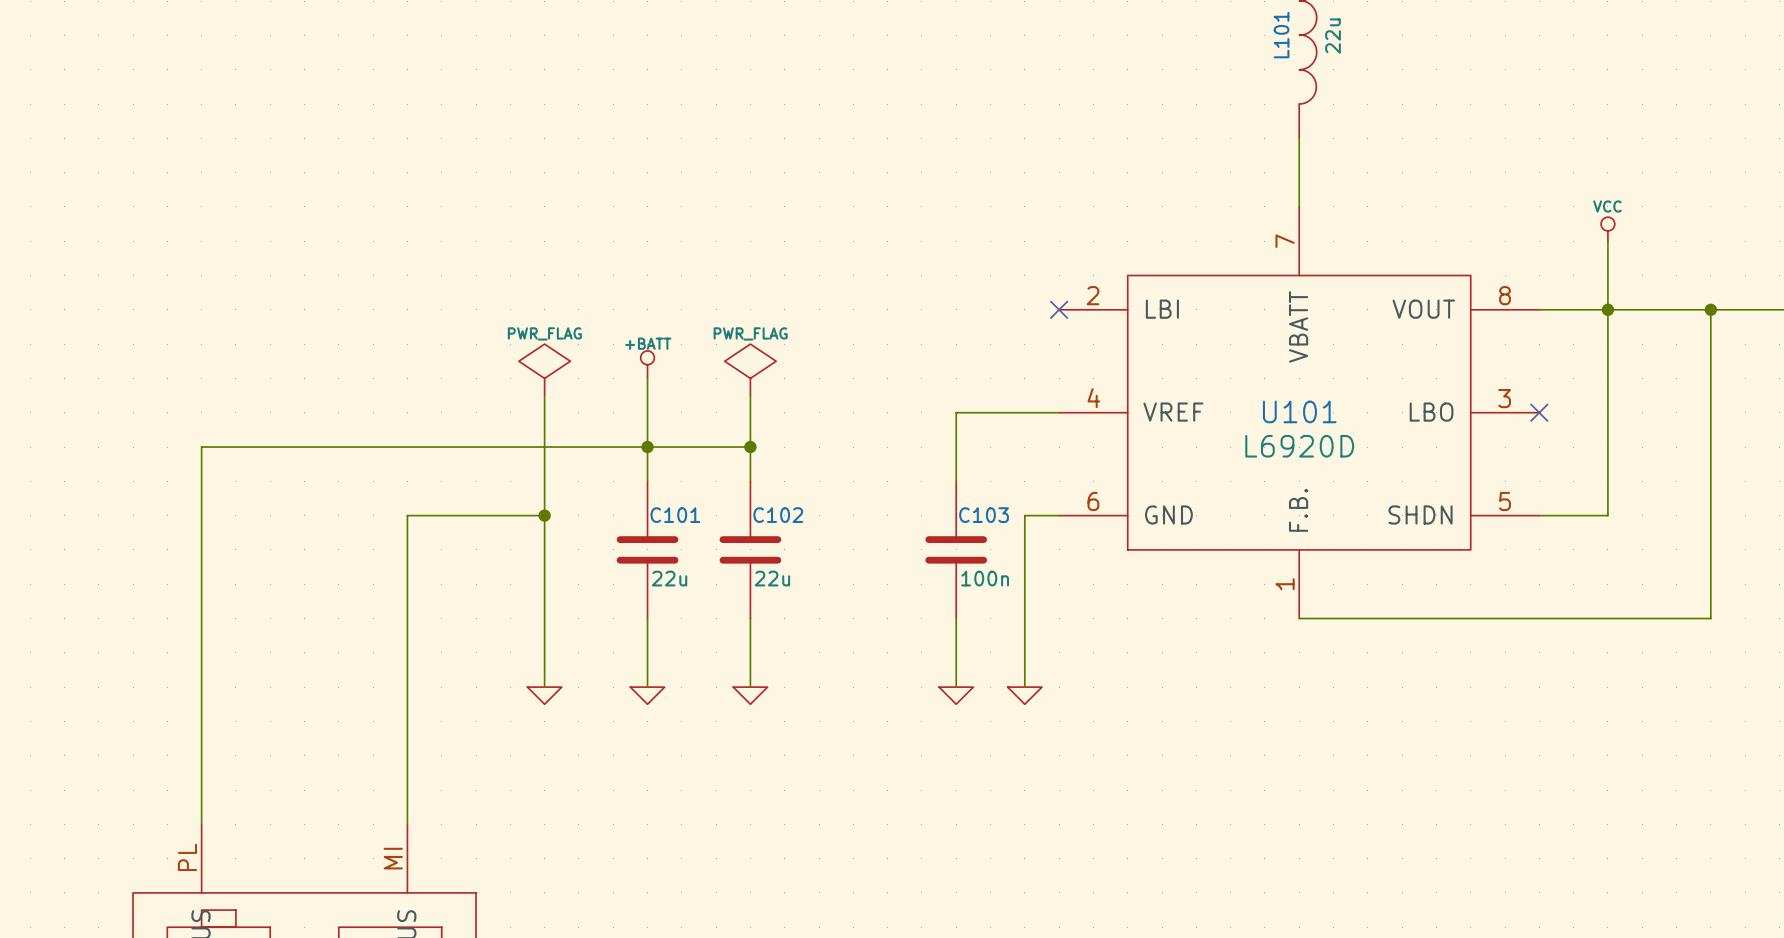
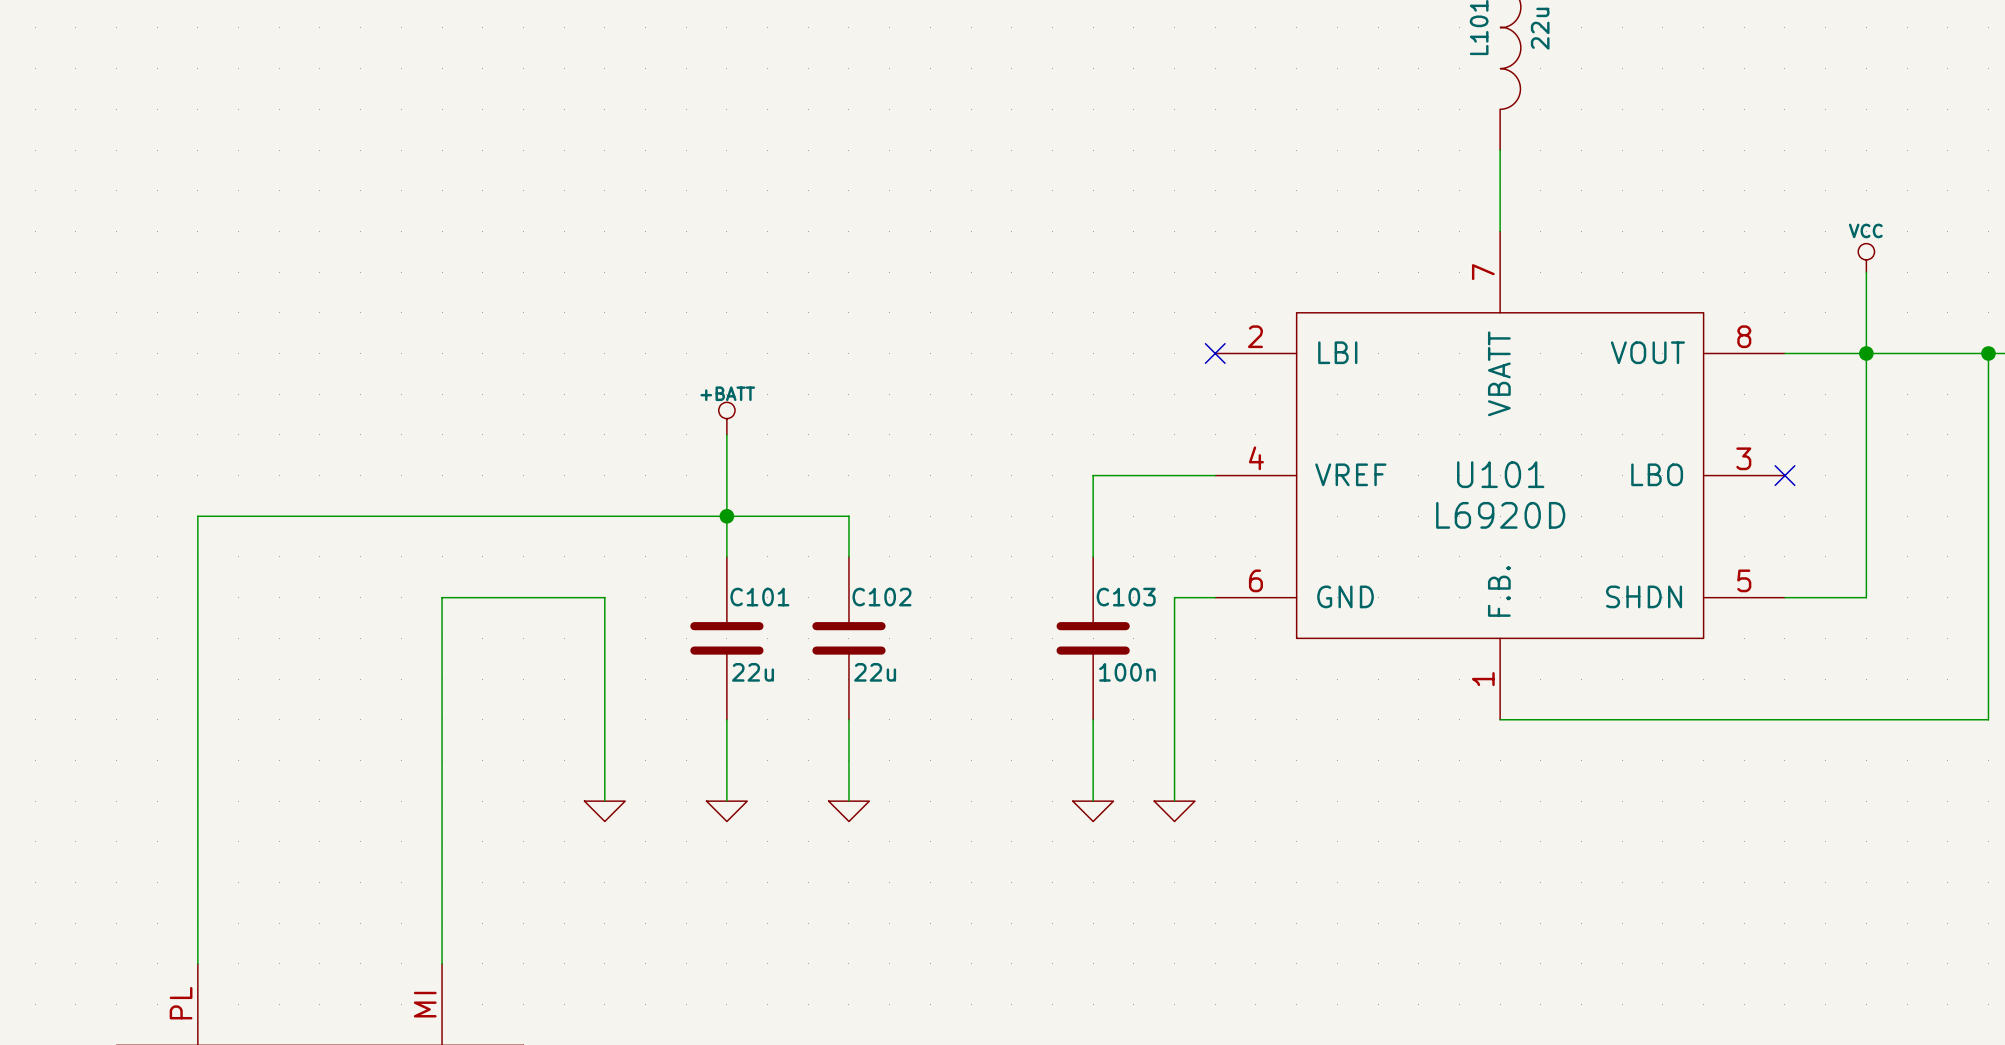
power symbol: PWR_FLAG (544, 369) -> none
power symbol: PWR_FLAG (750, 369) -> none
wire: (544, 395) (544, 515) -> none
wire: (750, 395) (750, 447) -> none
junction: (750, 447) -> none
junction: (544, 515) -> none

